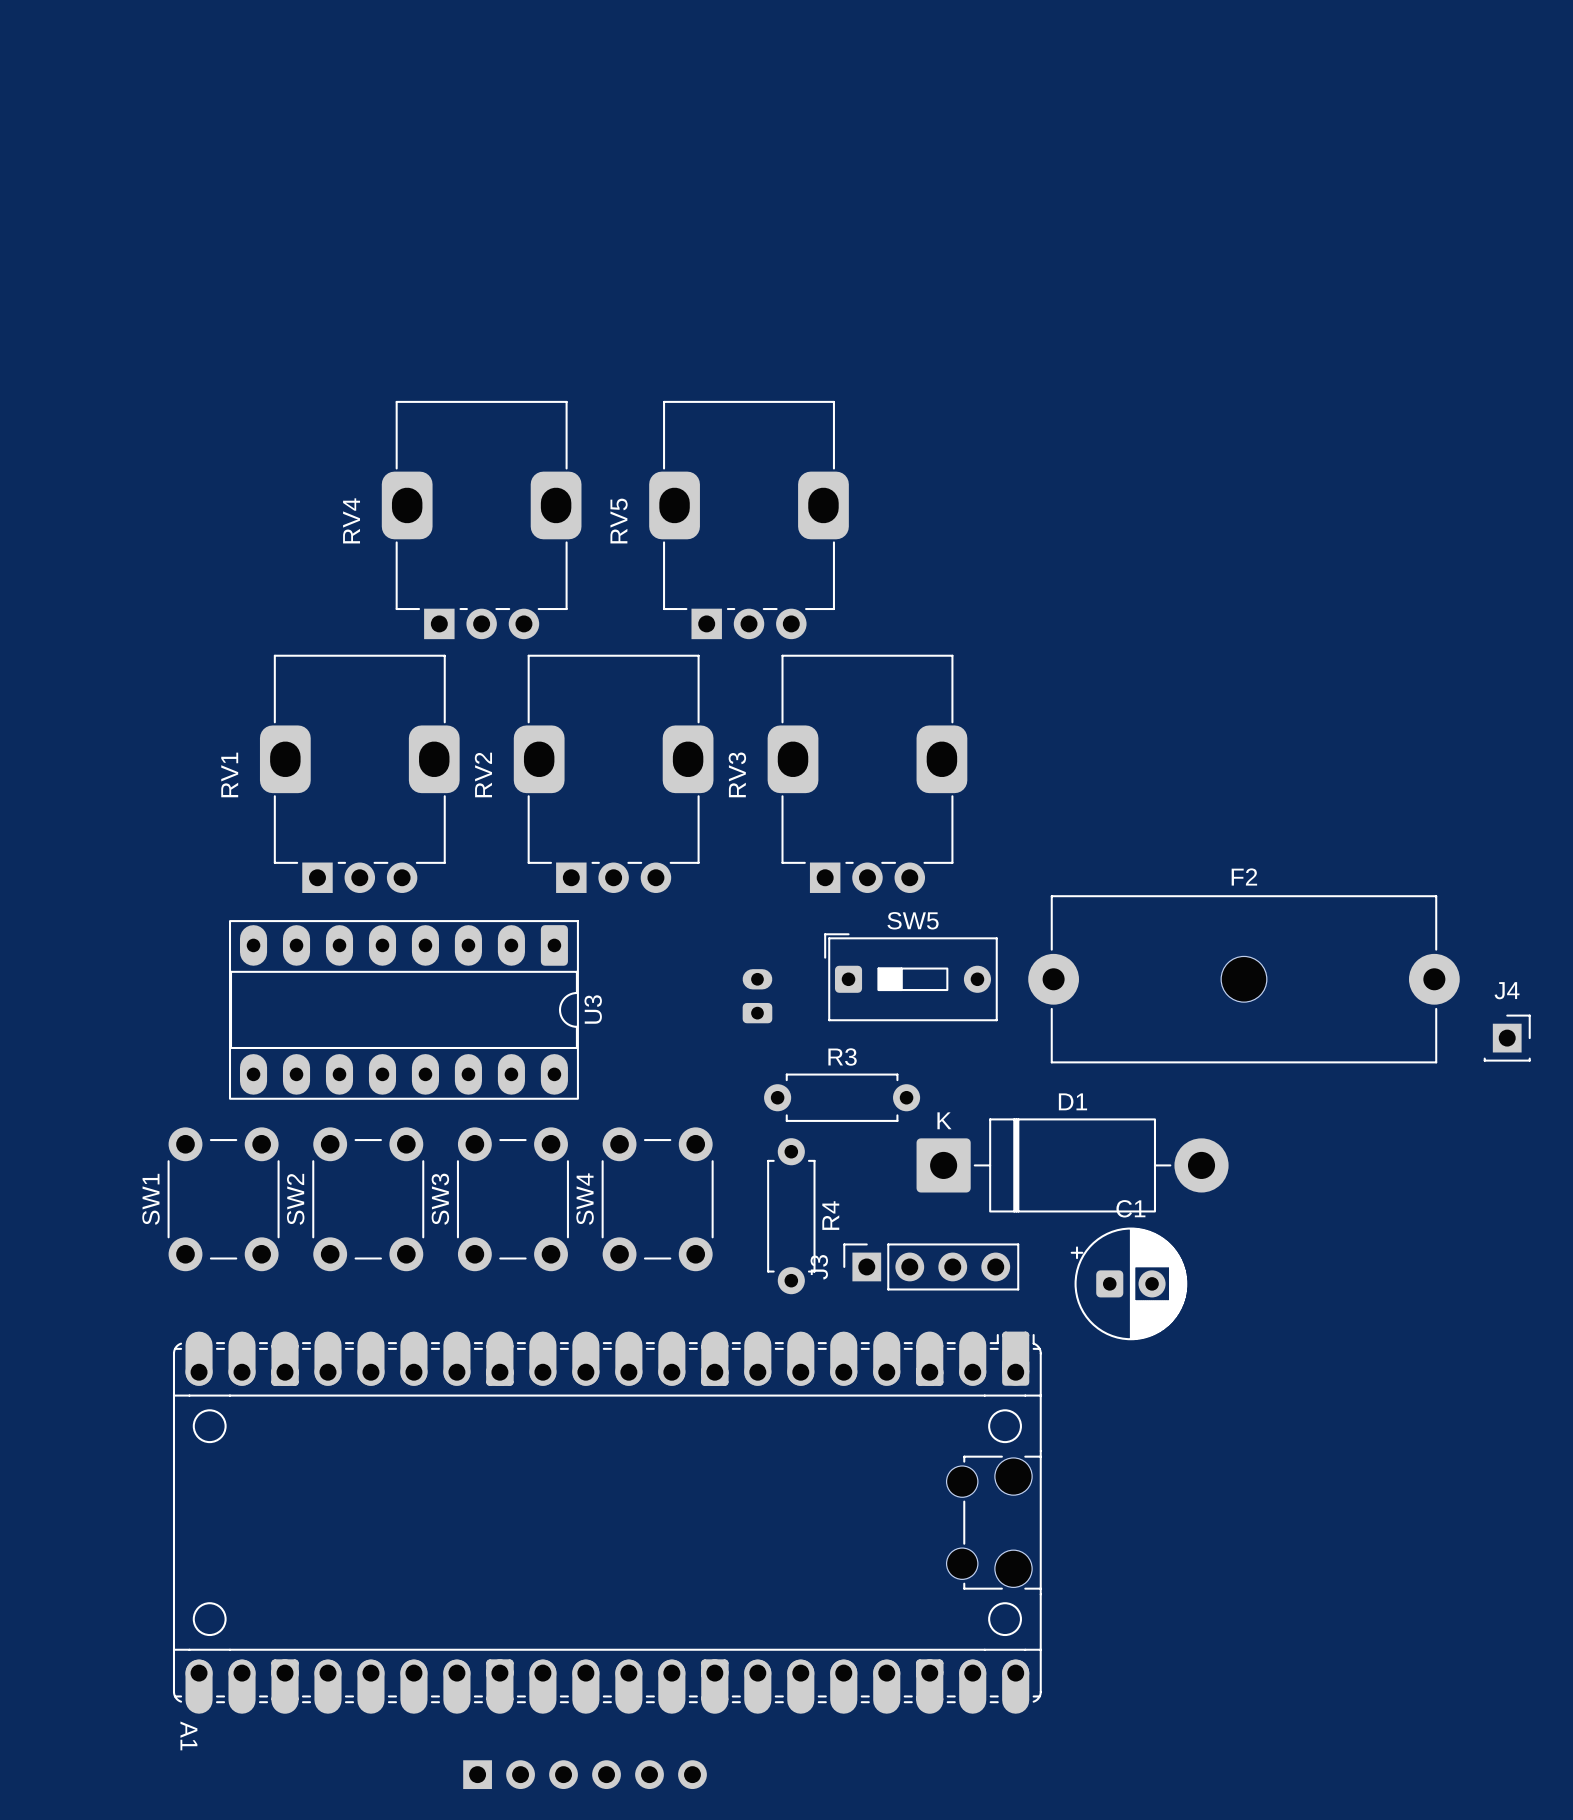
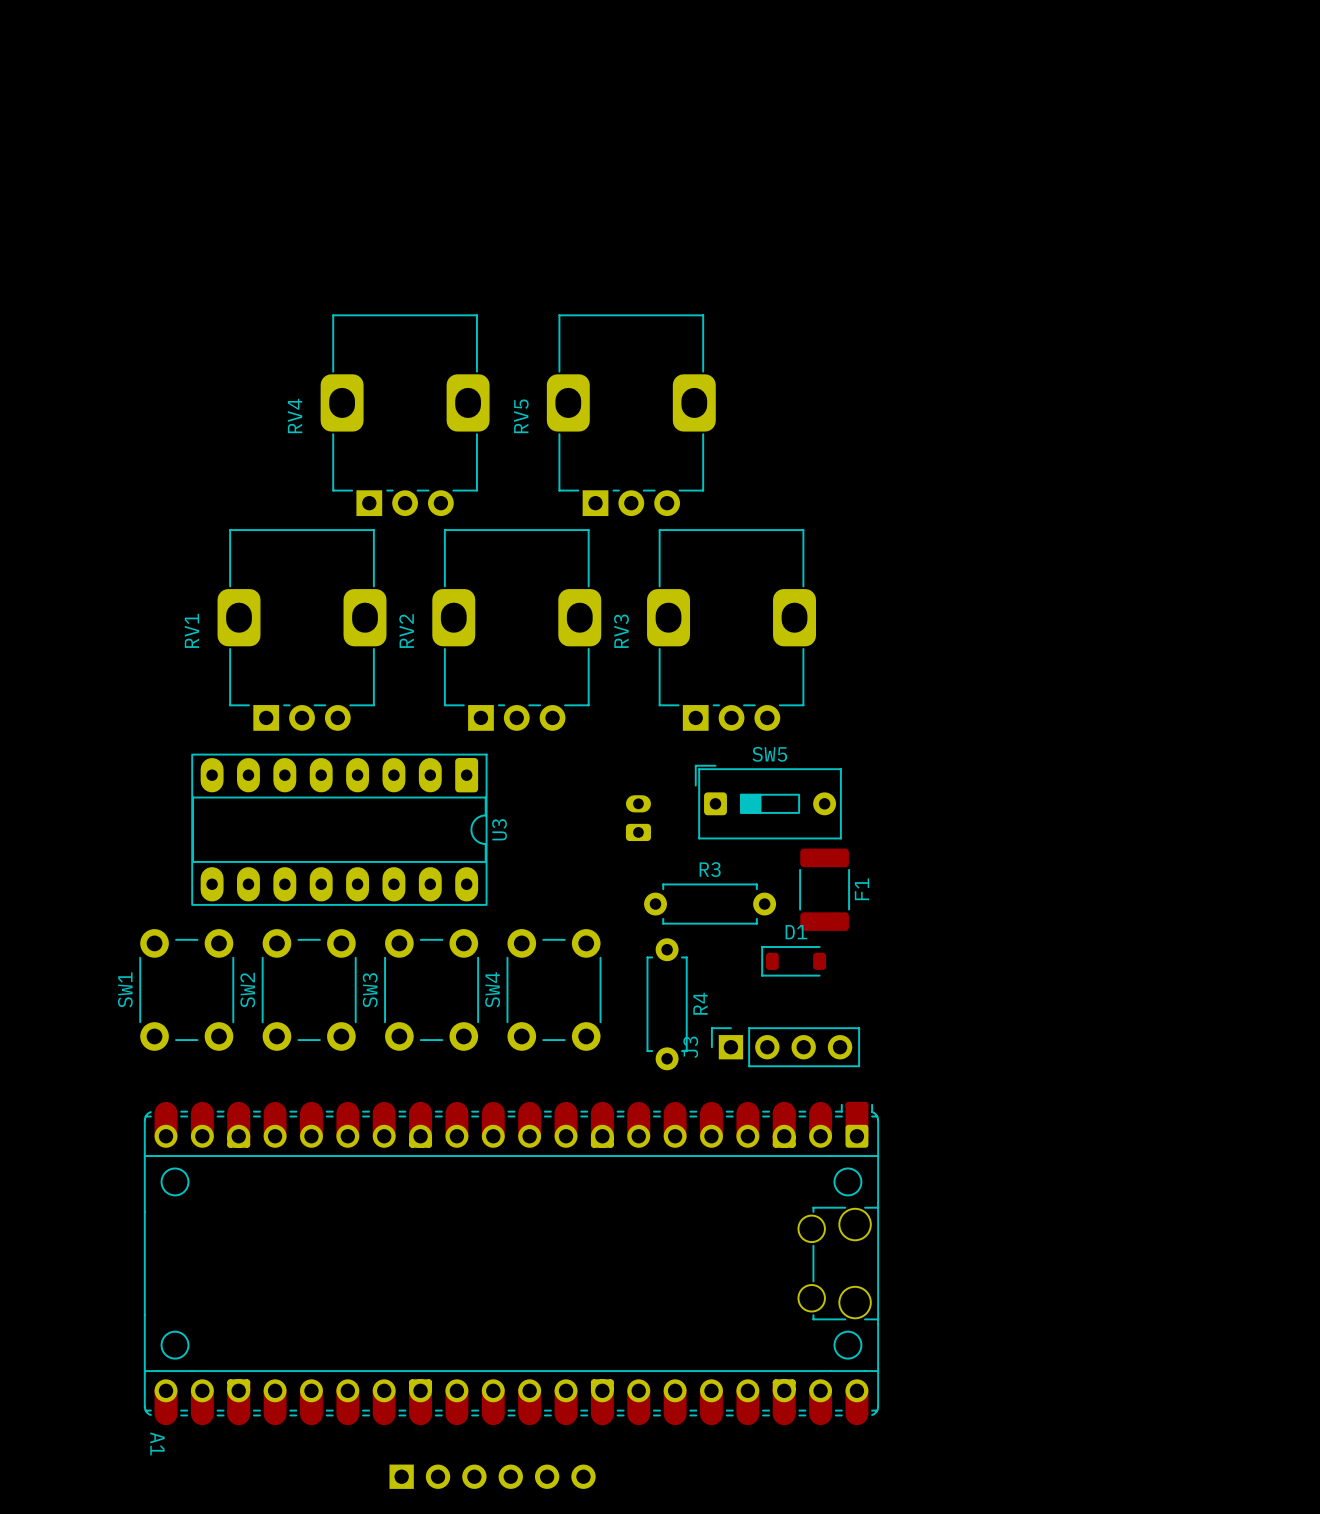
F2: (1243, 979) -> none
J4: (1507, 1038) -> none
F1: none -> (824, 889)
D1 footprint: [916, 1118, 1229, 1213] -> [761, 946, 827, 977]
C1: (1128, 1283) -> none

